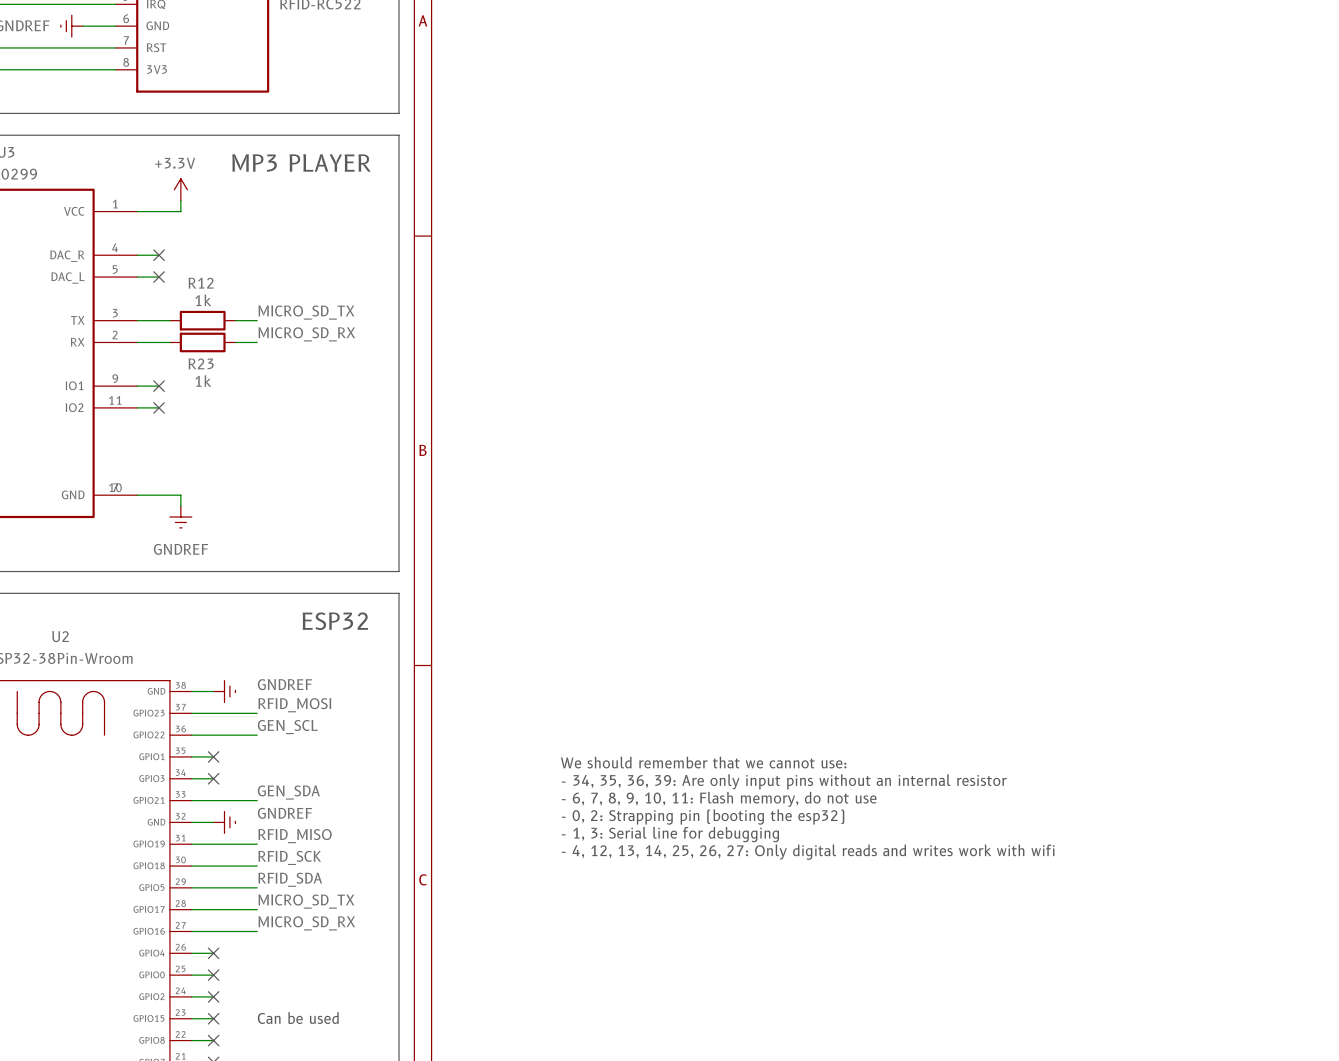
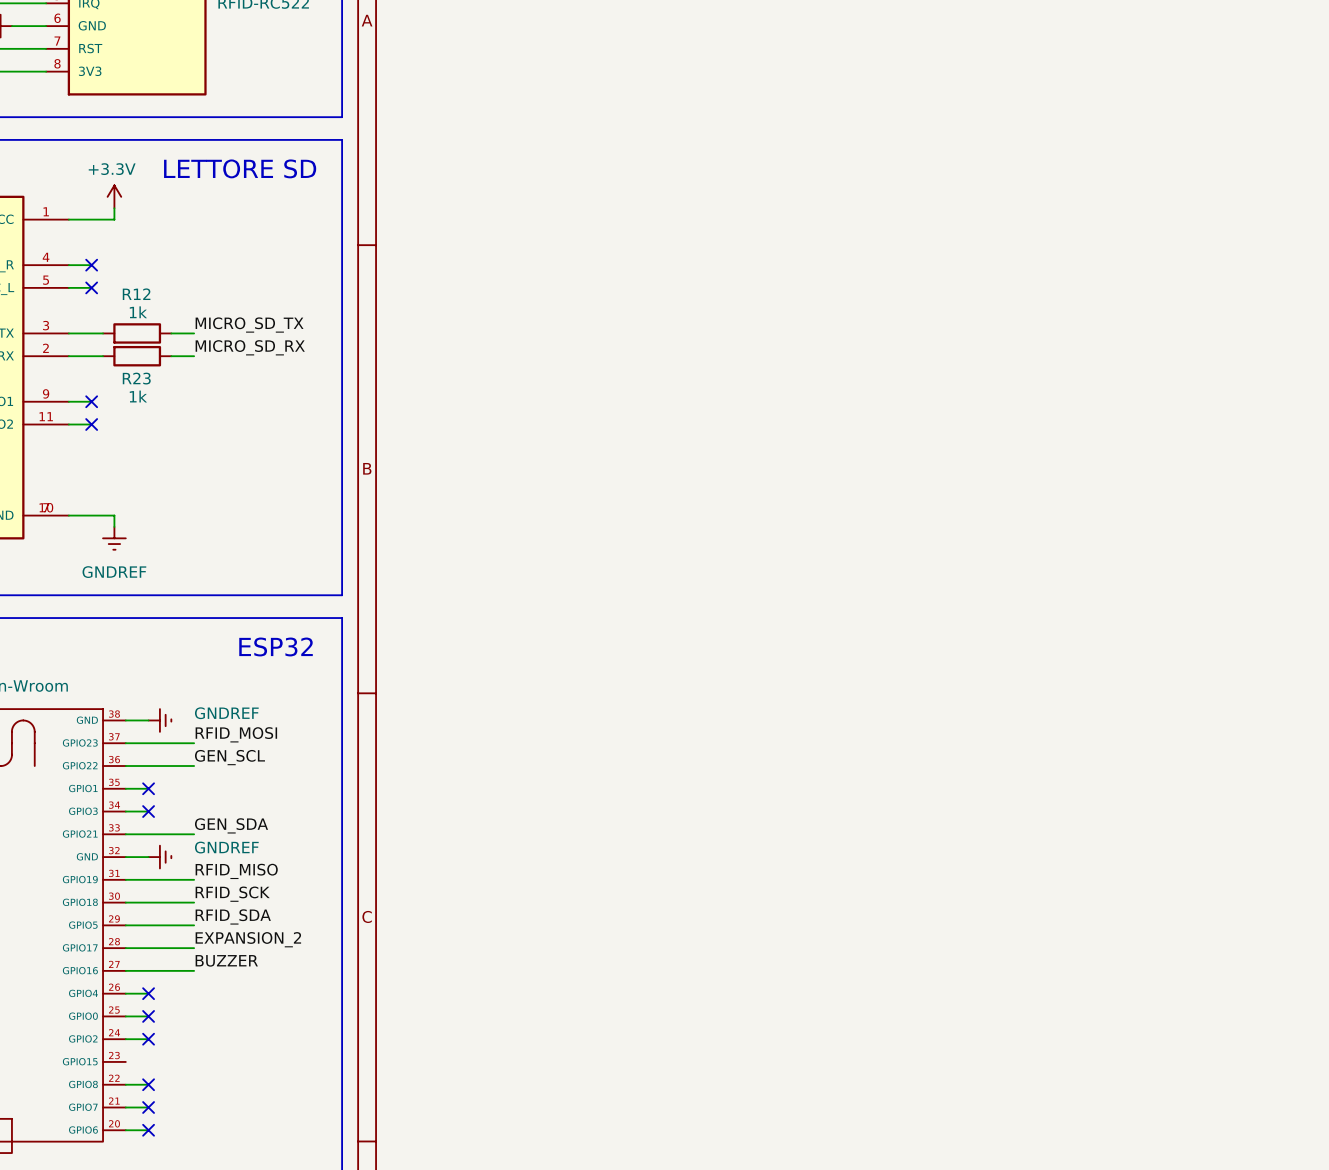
text: MP3 PLAYER (301, 162) -> LETTORE SD (240, 168)
text: We should remember that we cannot use: (703, 762) -> none
text: - 34, 35, 36, 39: Are only input pins without an internal resistor (784, 781) -> none
text: - 6, 7, 8, 9, 10, 11: Flash memory, do not use (719, 799) -> none
text: - 0, 2: Strapping pin (booting the esp32) (703, 817) -> none
text: - 1, 3: Serial line for debugging (670, 834) -> none
text: - 4, 12, 13, 14, 25, 26, 27: Only digital reads and writes work with wifi (808, 852) -> none
label: MICRO_SD_TX (306, 901) -> EXPANSION_2 (248, 939)
label: MICRO_SD_RX (306, 923) -> BUZZER (226, 960)
wire: (191, 1018) (213, 1018) -> none
no-connect mark: (213, 1018) -> none
text: Can be used (298, 1018) -> none

